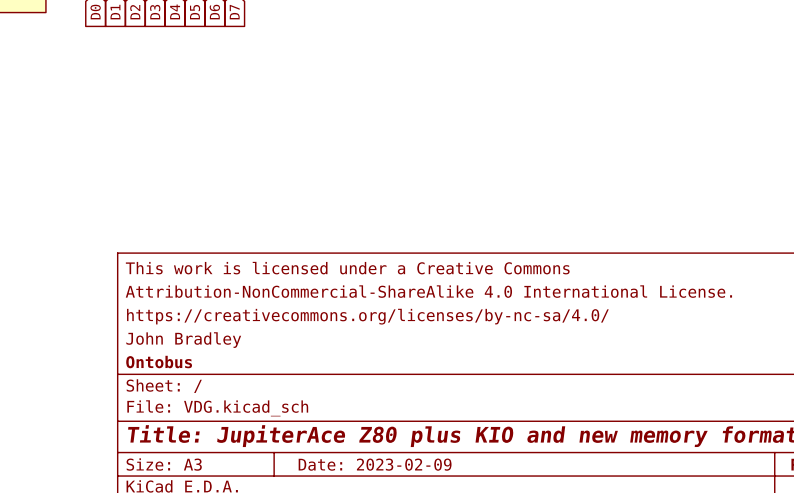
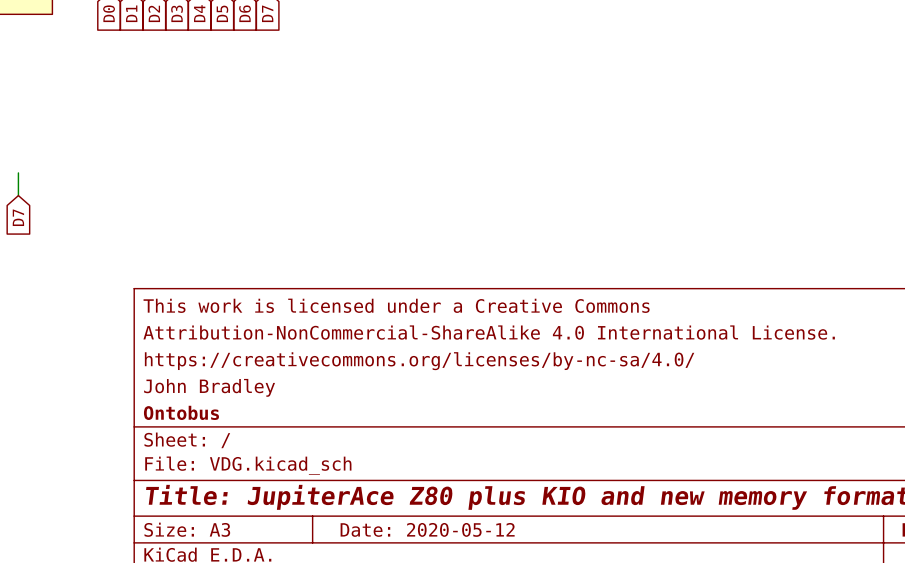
wire: none -> (18, 172) (18, 195)
global label: none -> D7 (18, 217)
title block: Date: 2023-02-09 (375, 464) -> Date: 2020-05-12 (427, 529)

